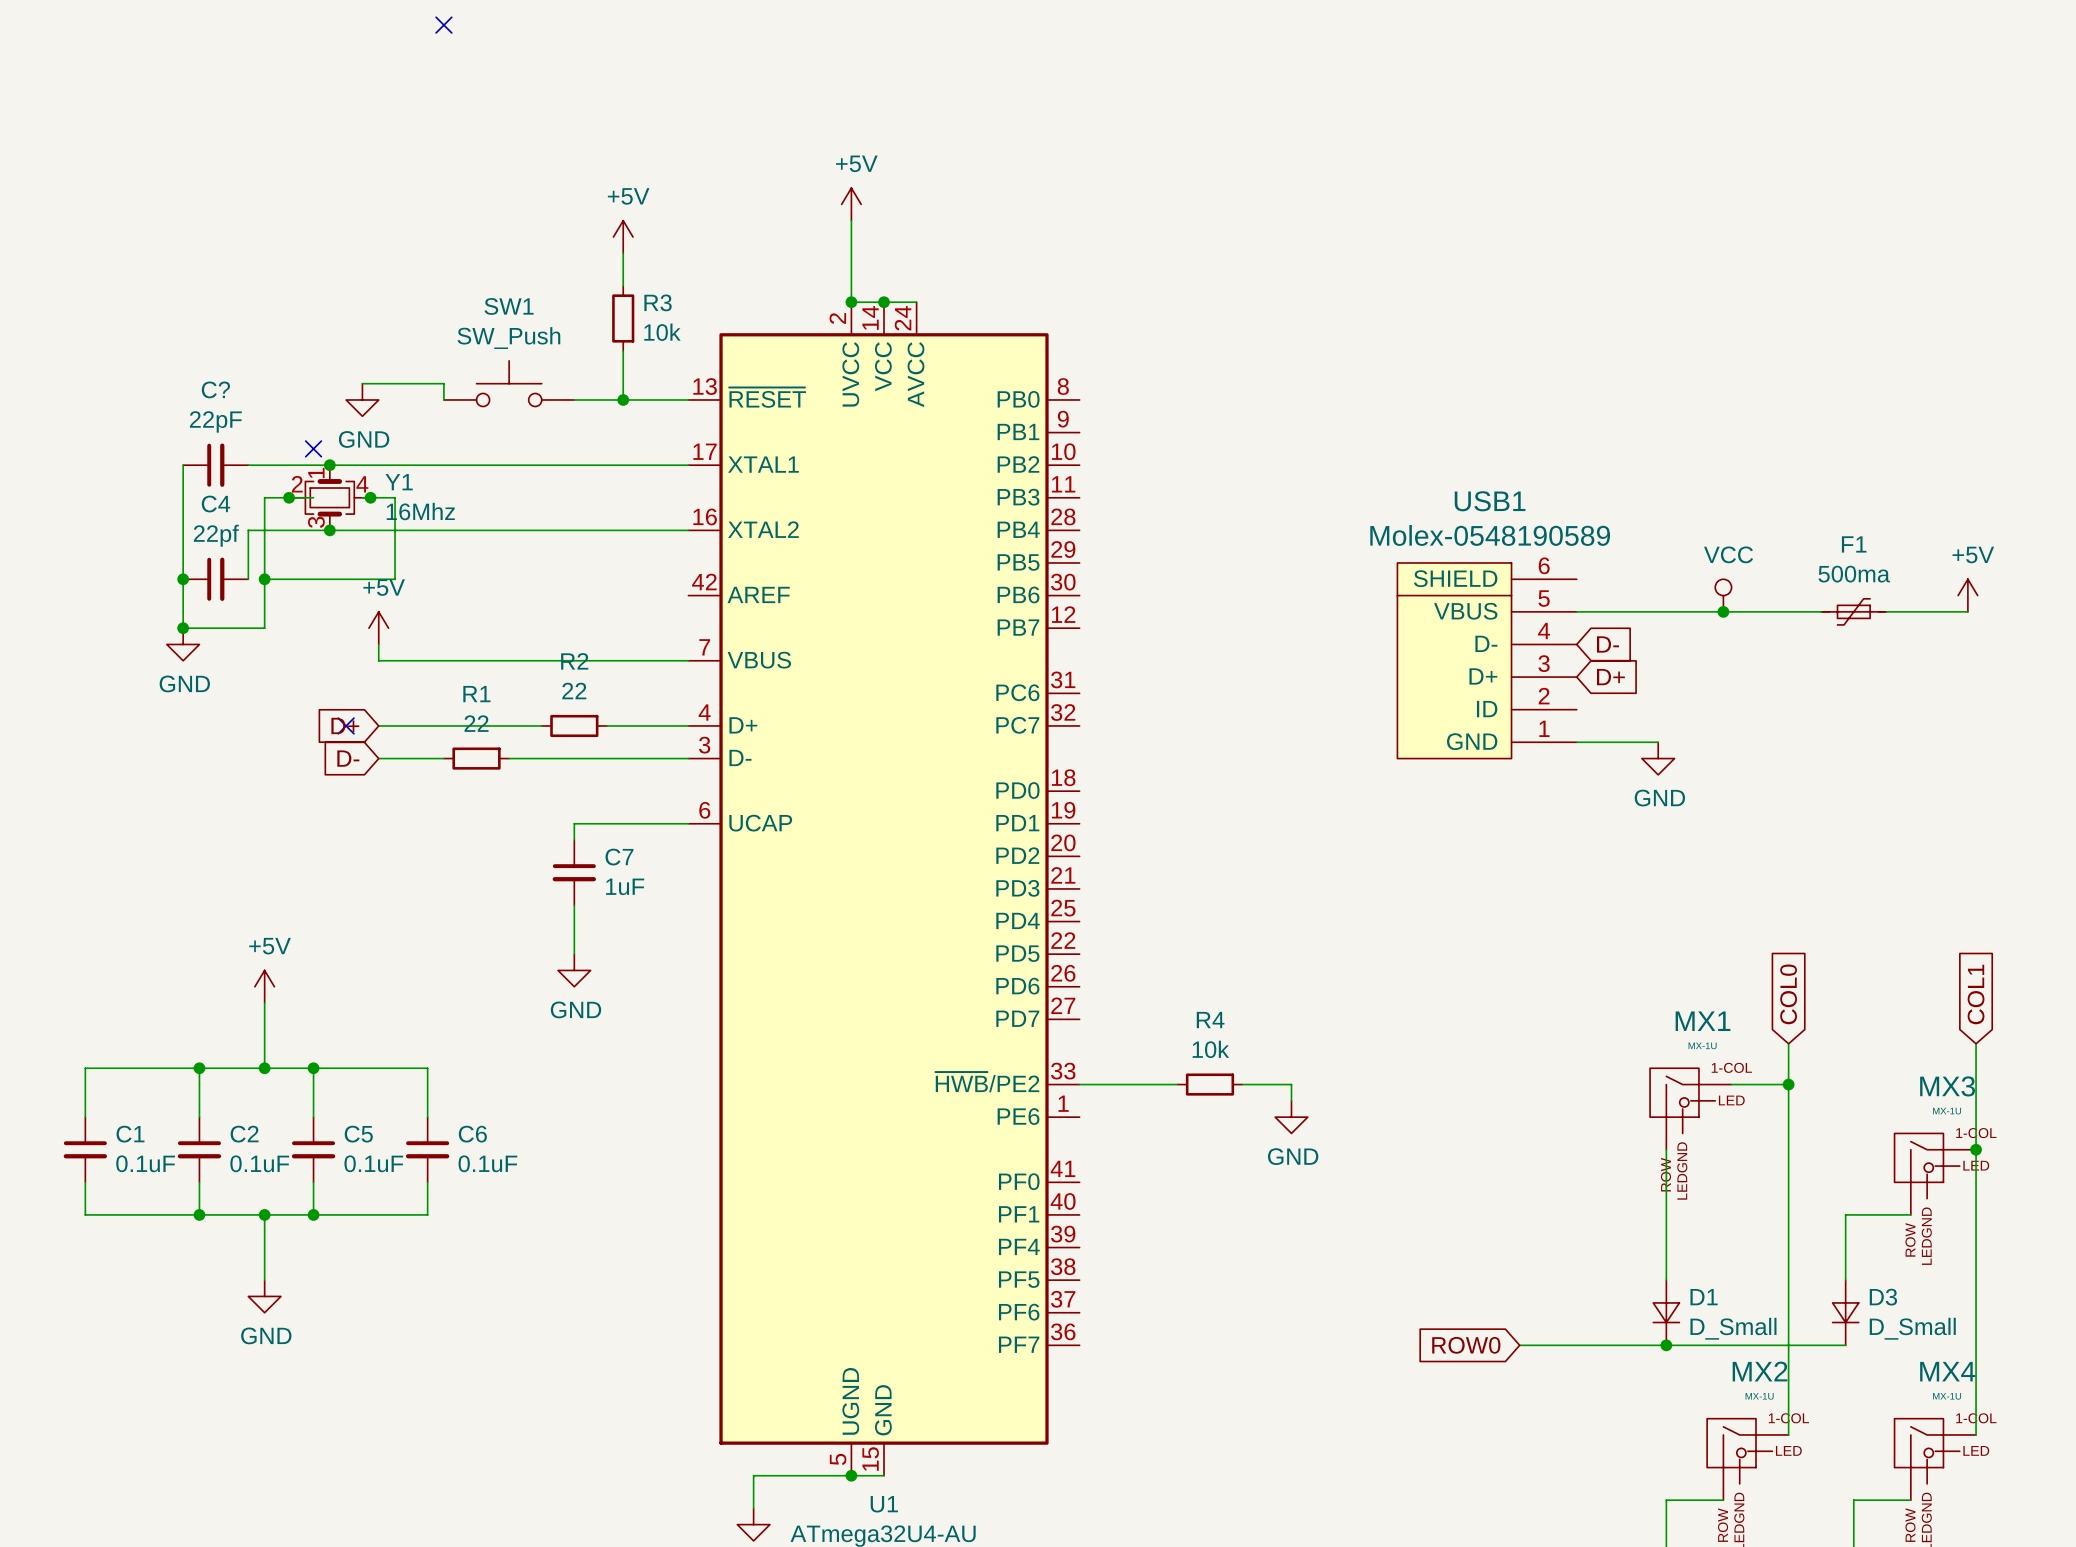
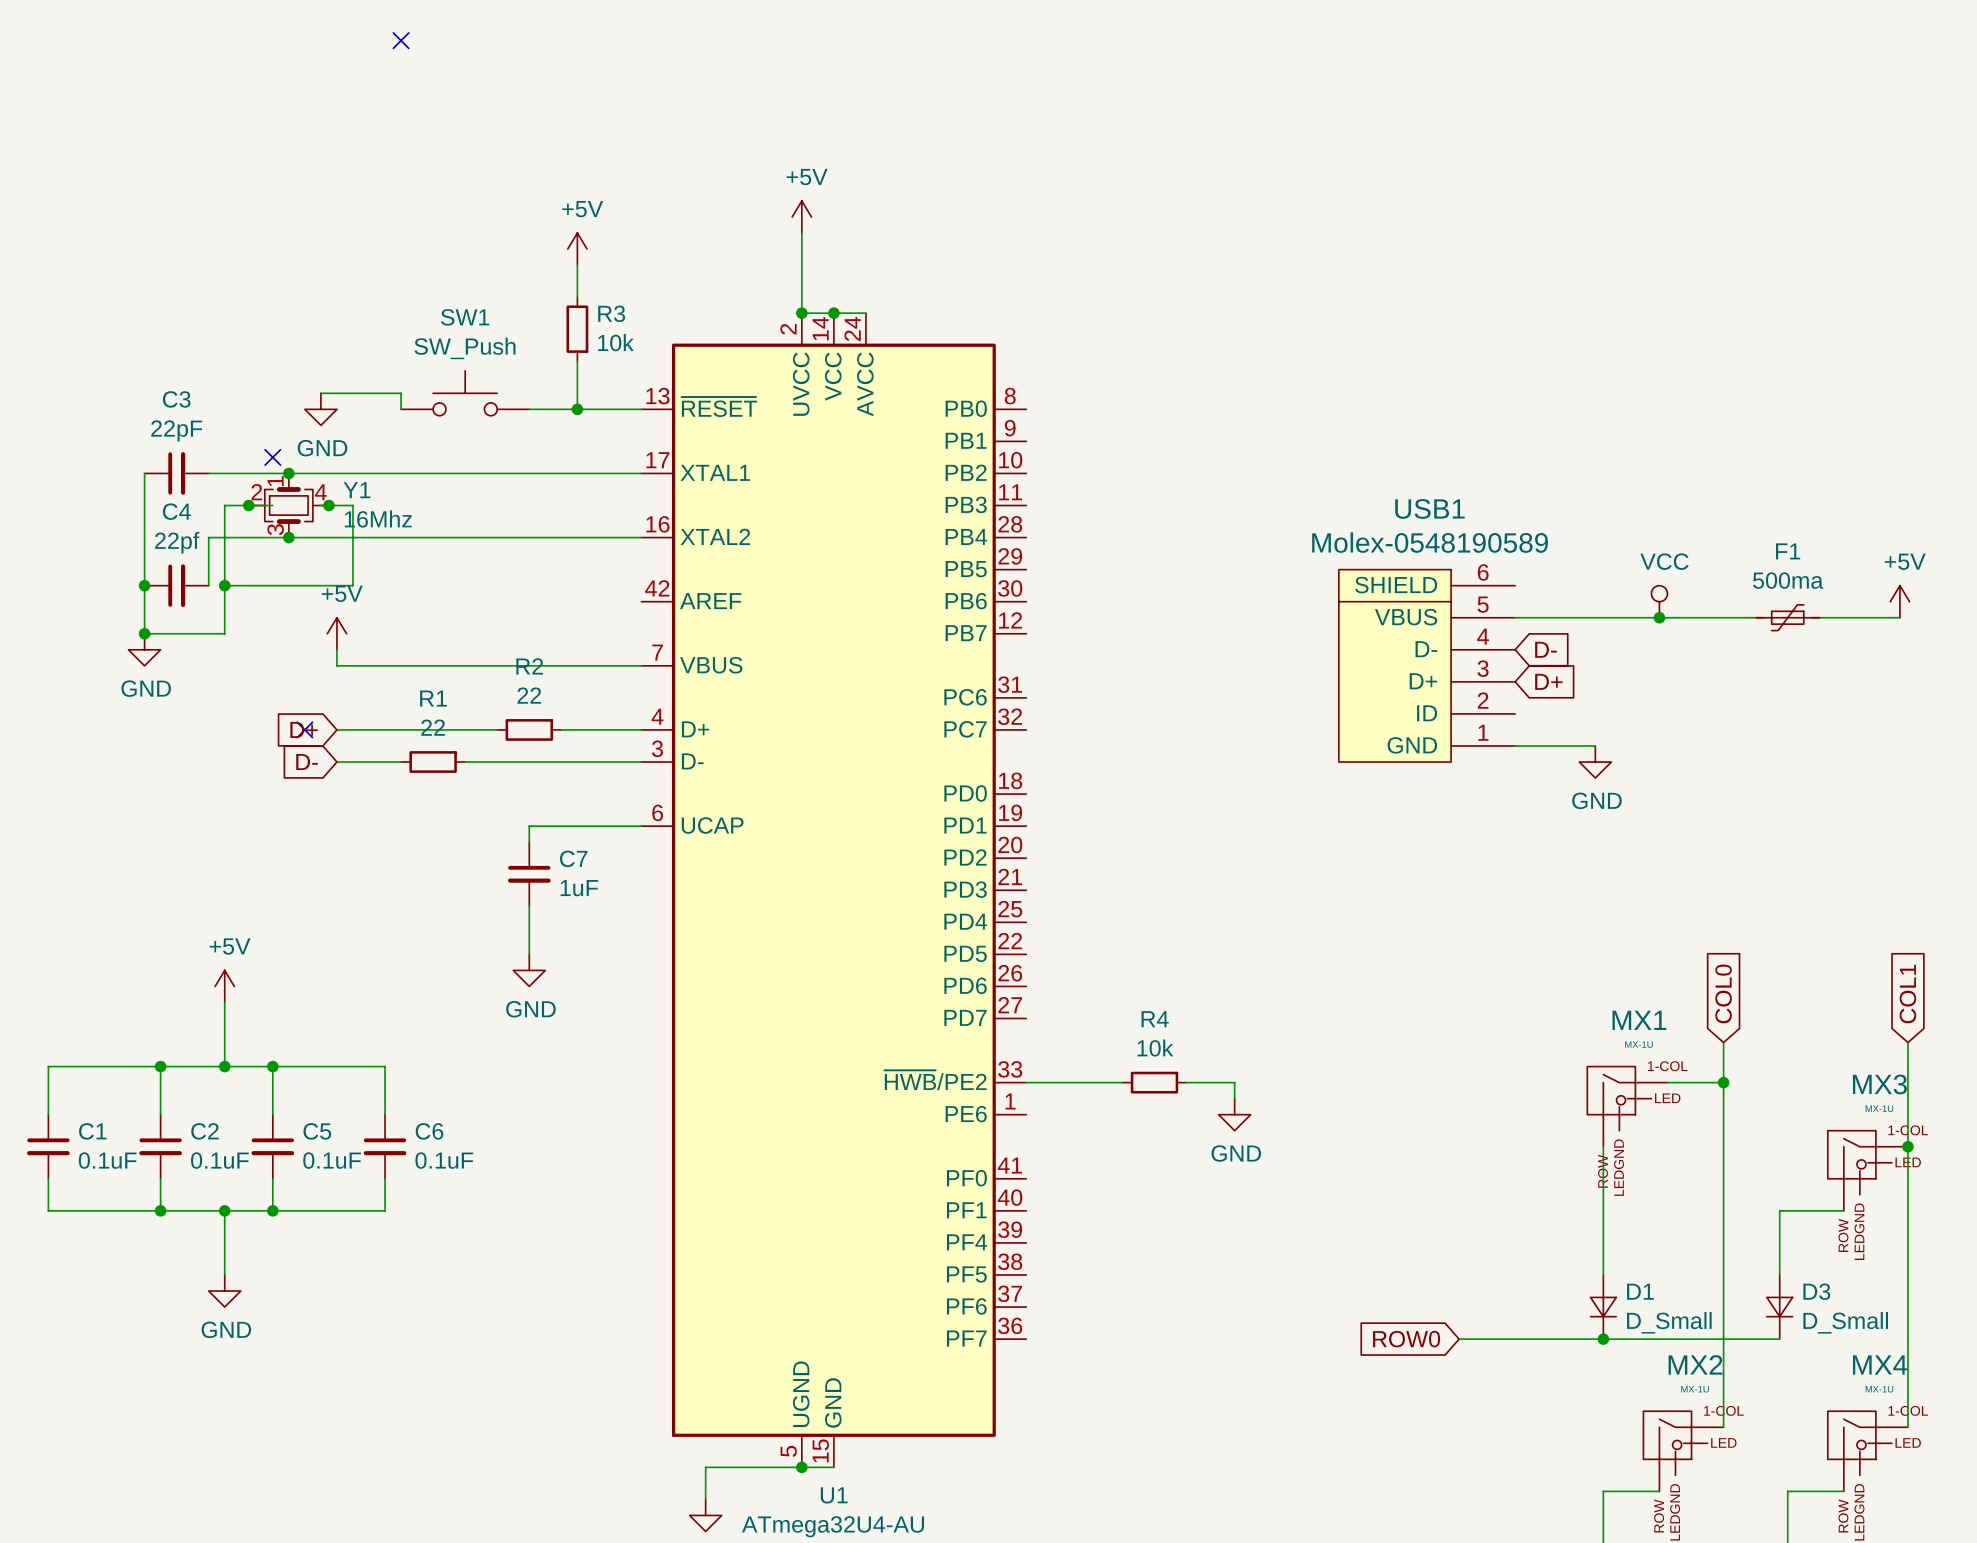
C? name: C? (215, 389) -> C3 (176, 399)

